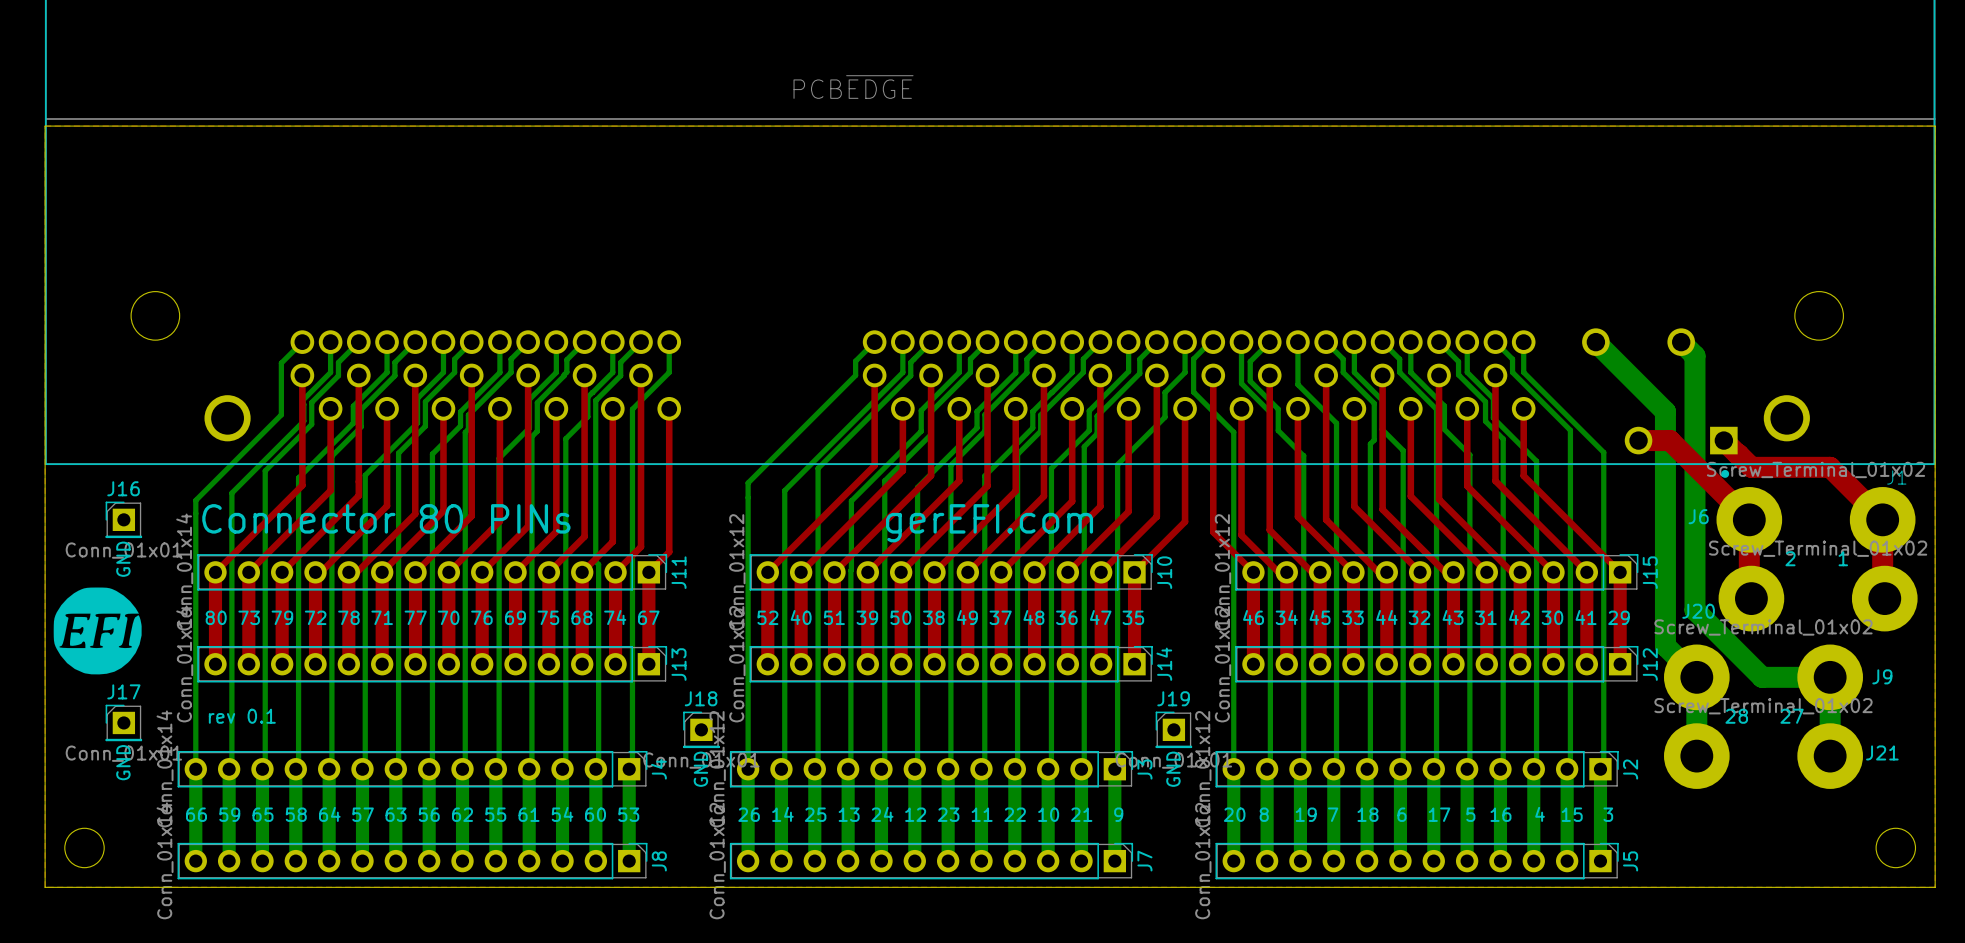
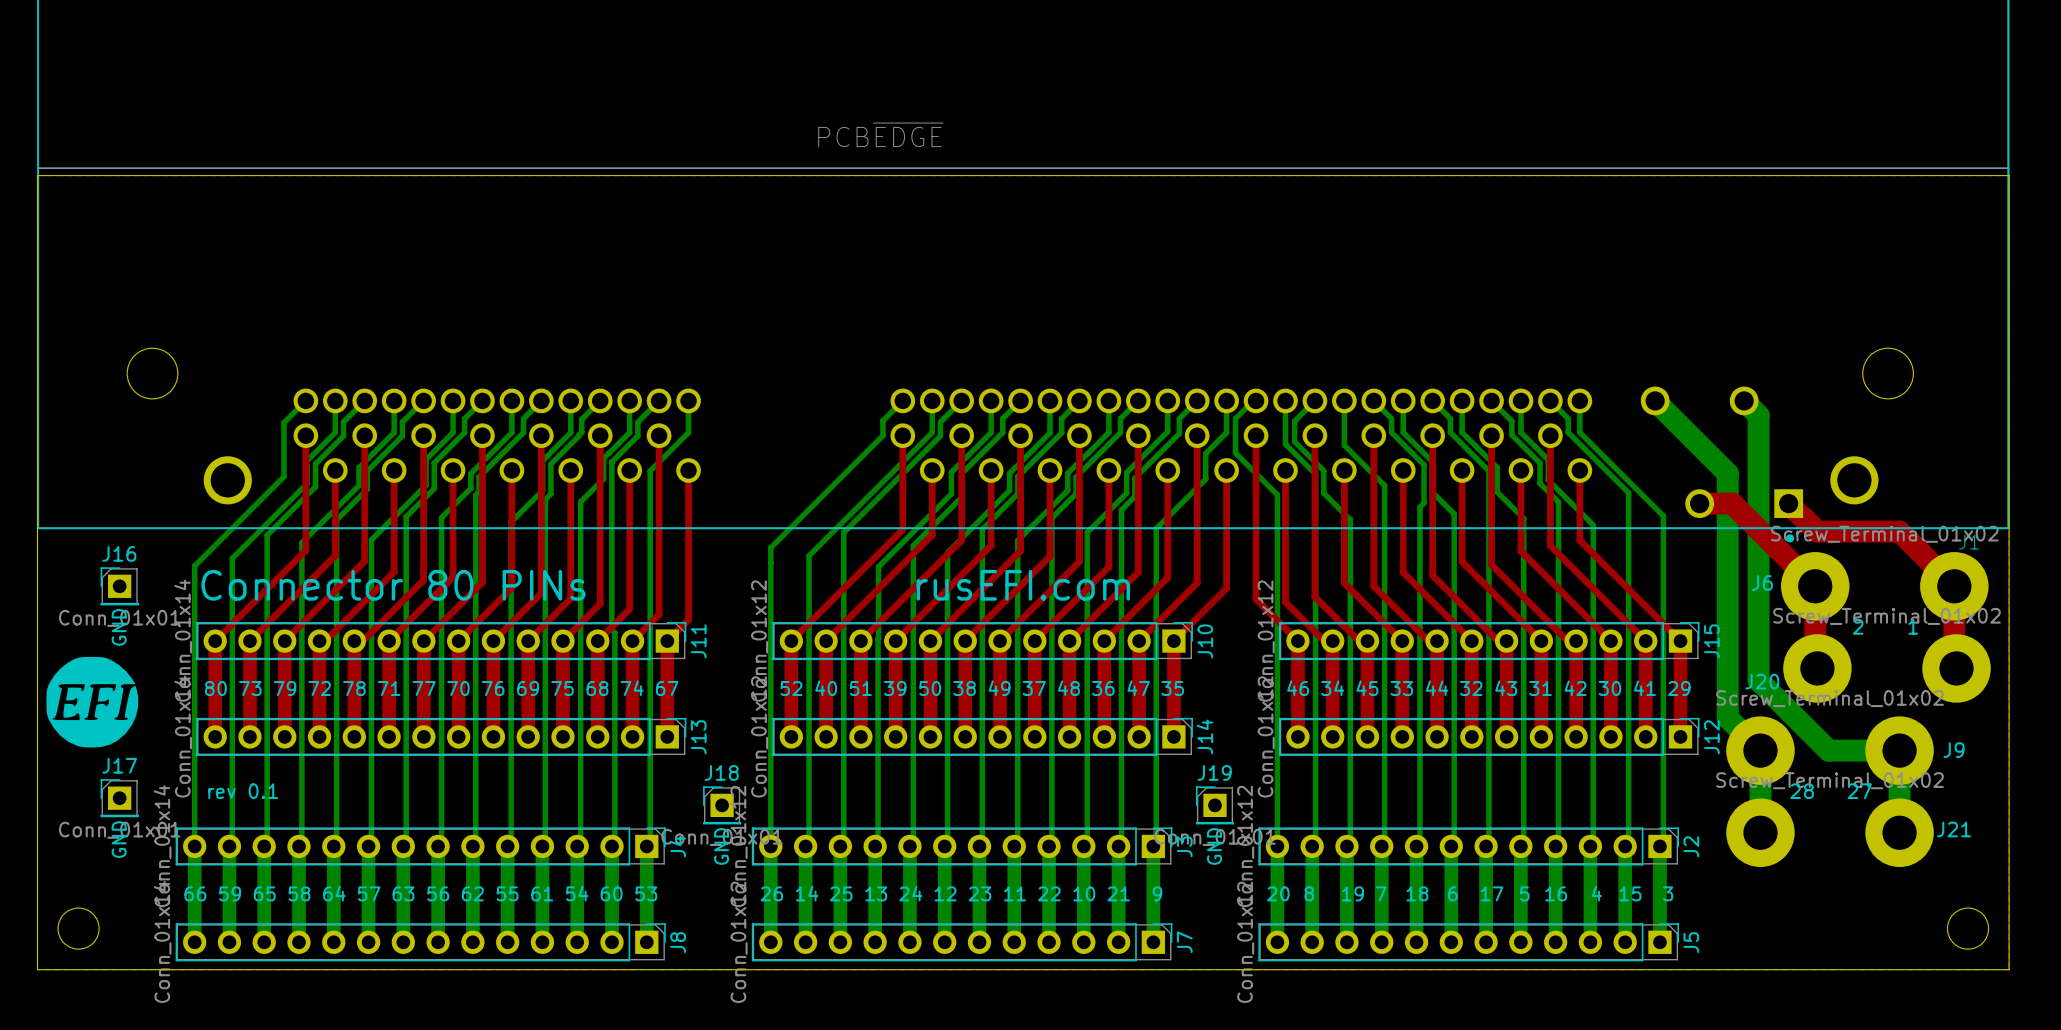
text: gerEFI.com (989, 523) -> rusEFI.com (1023, 585)

